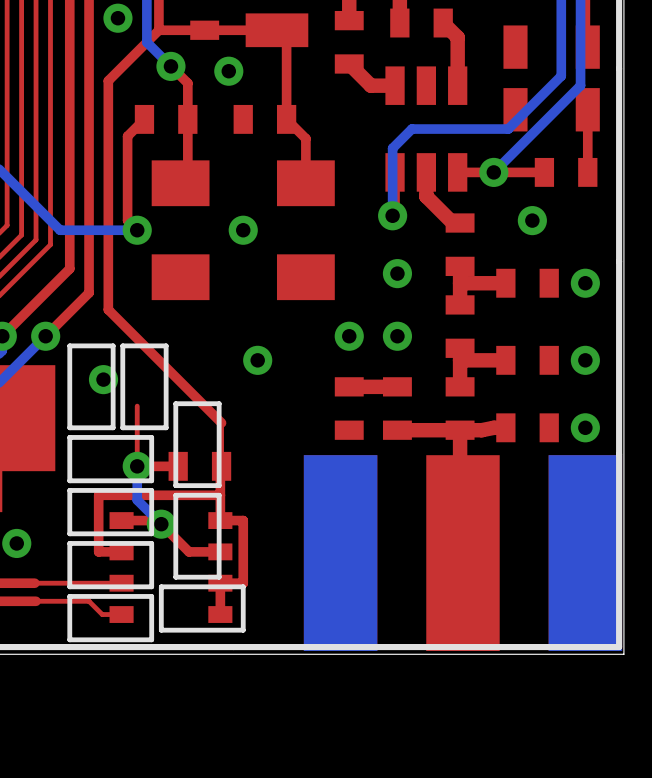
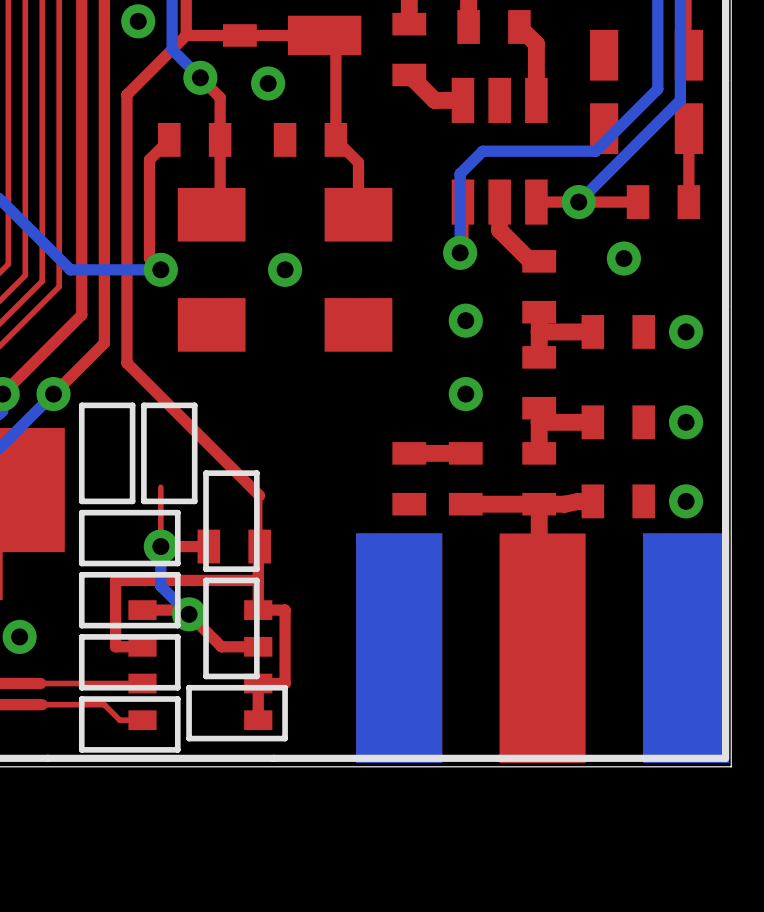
via: (349, 336) -> none
via: (257, 360) -> none
via: (103, 379) -> none
top track: (137, 406) (137, 415) -> none

